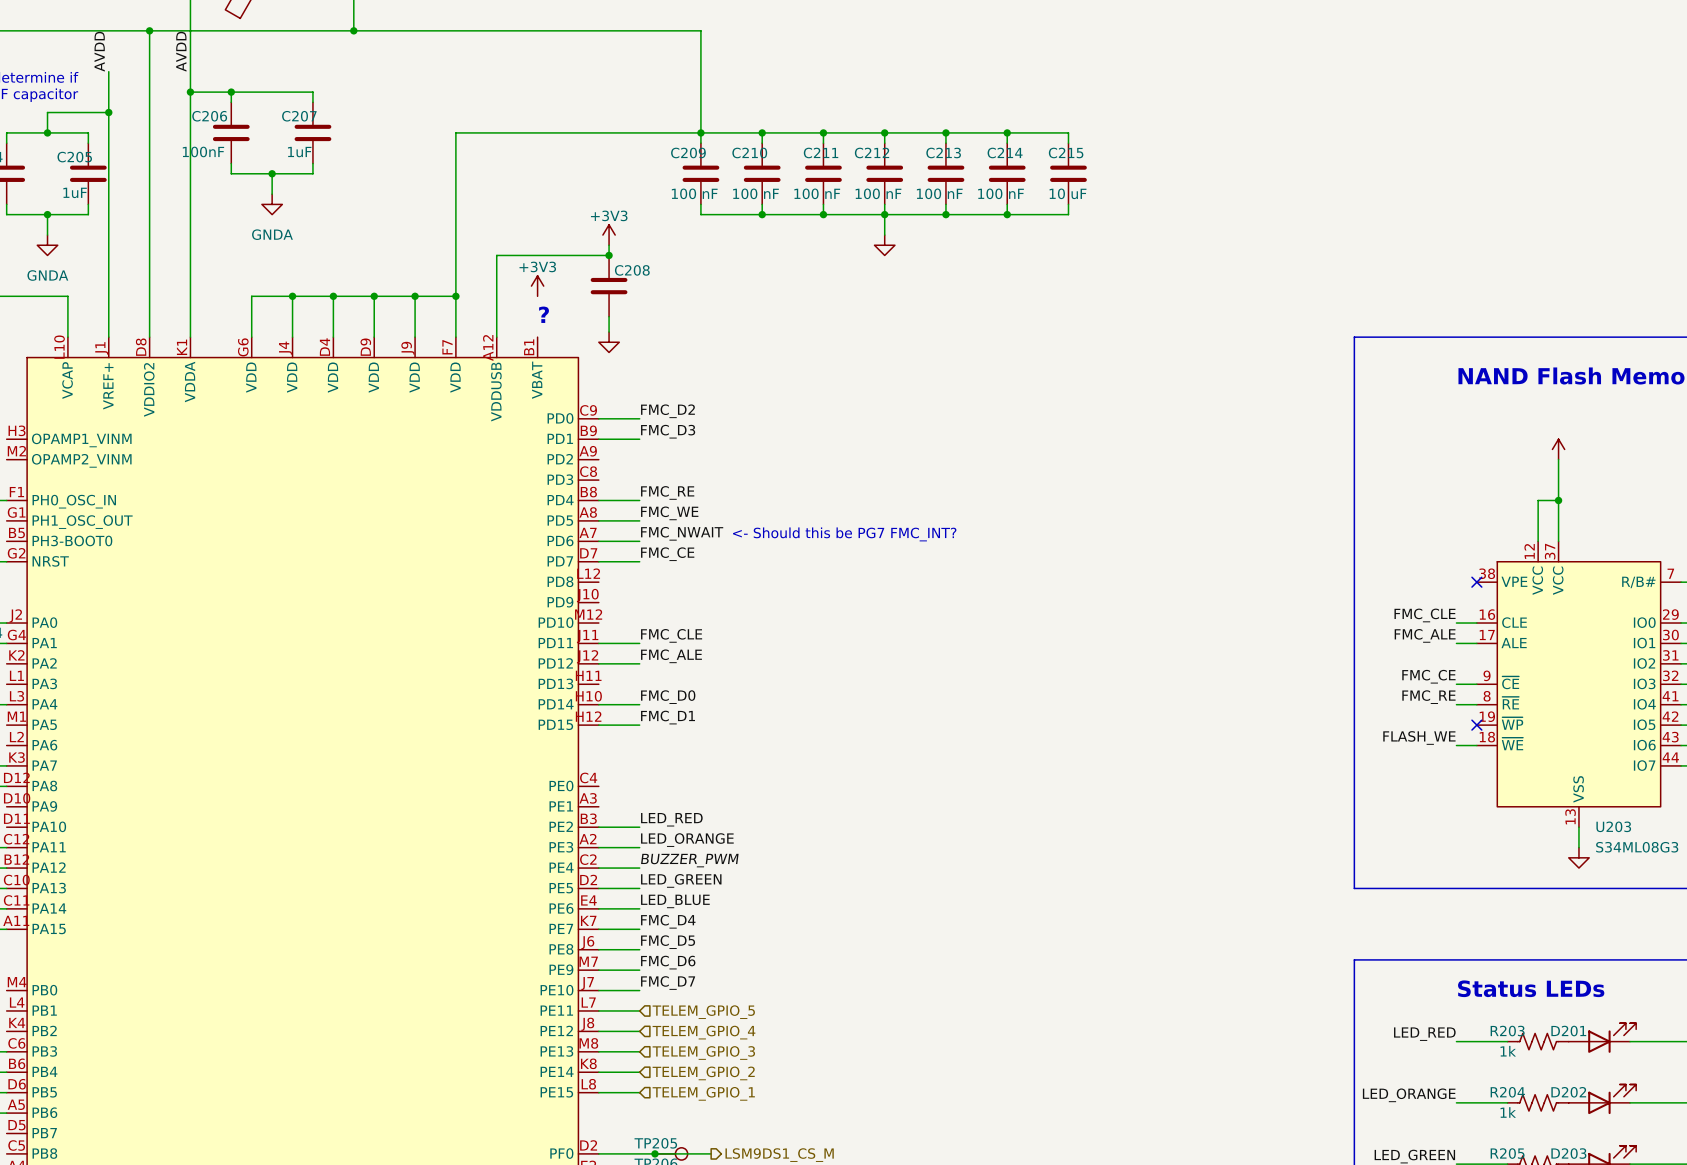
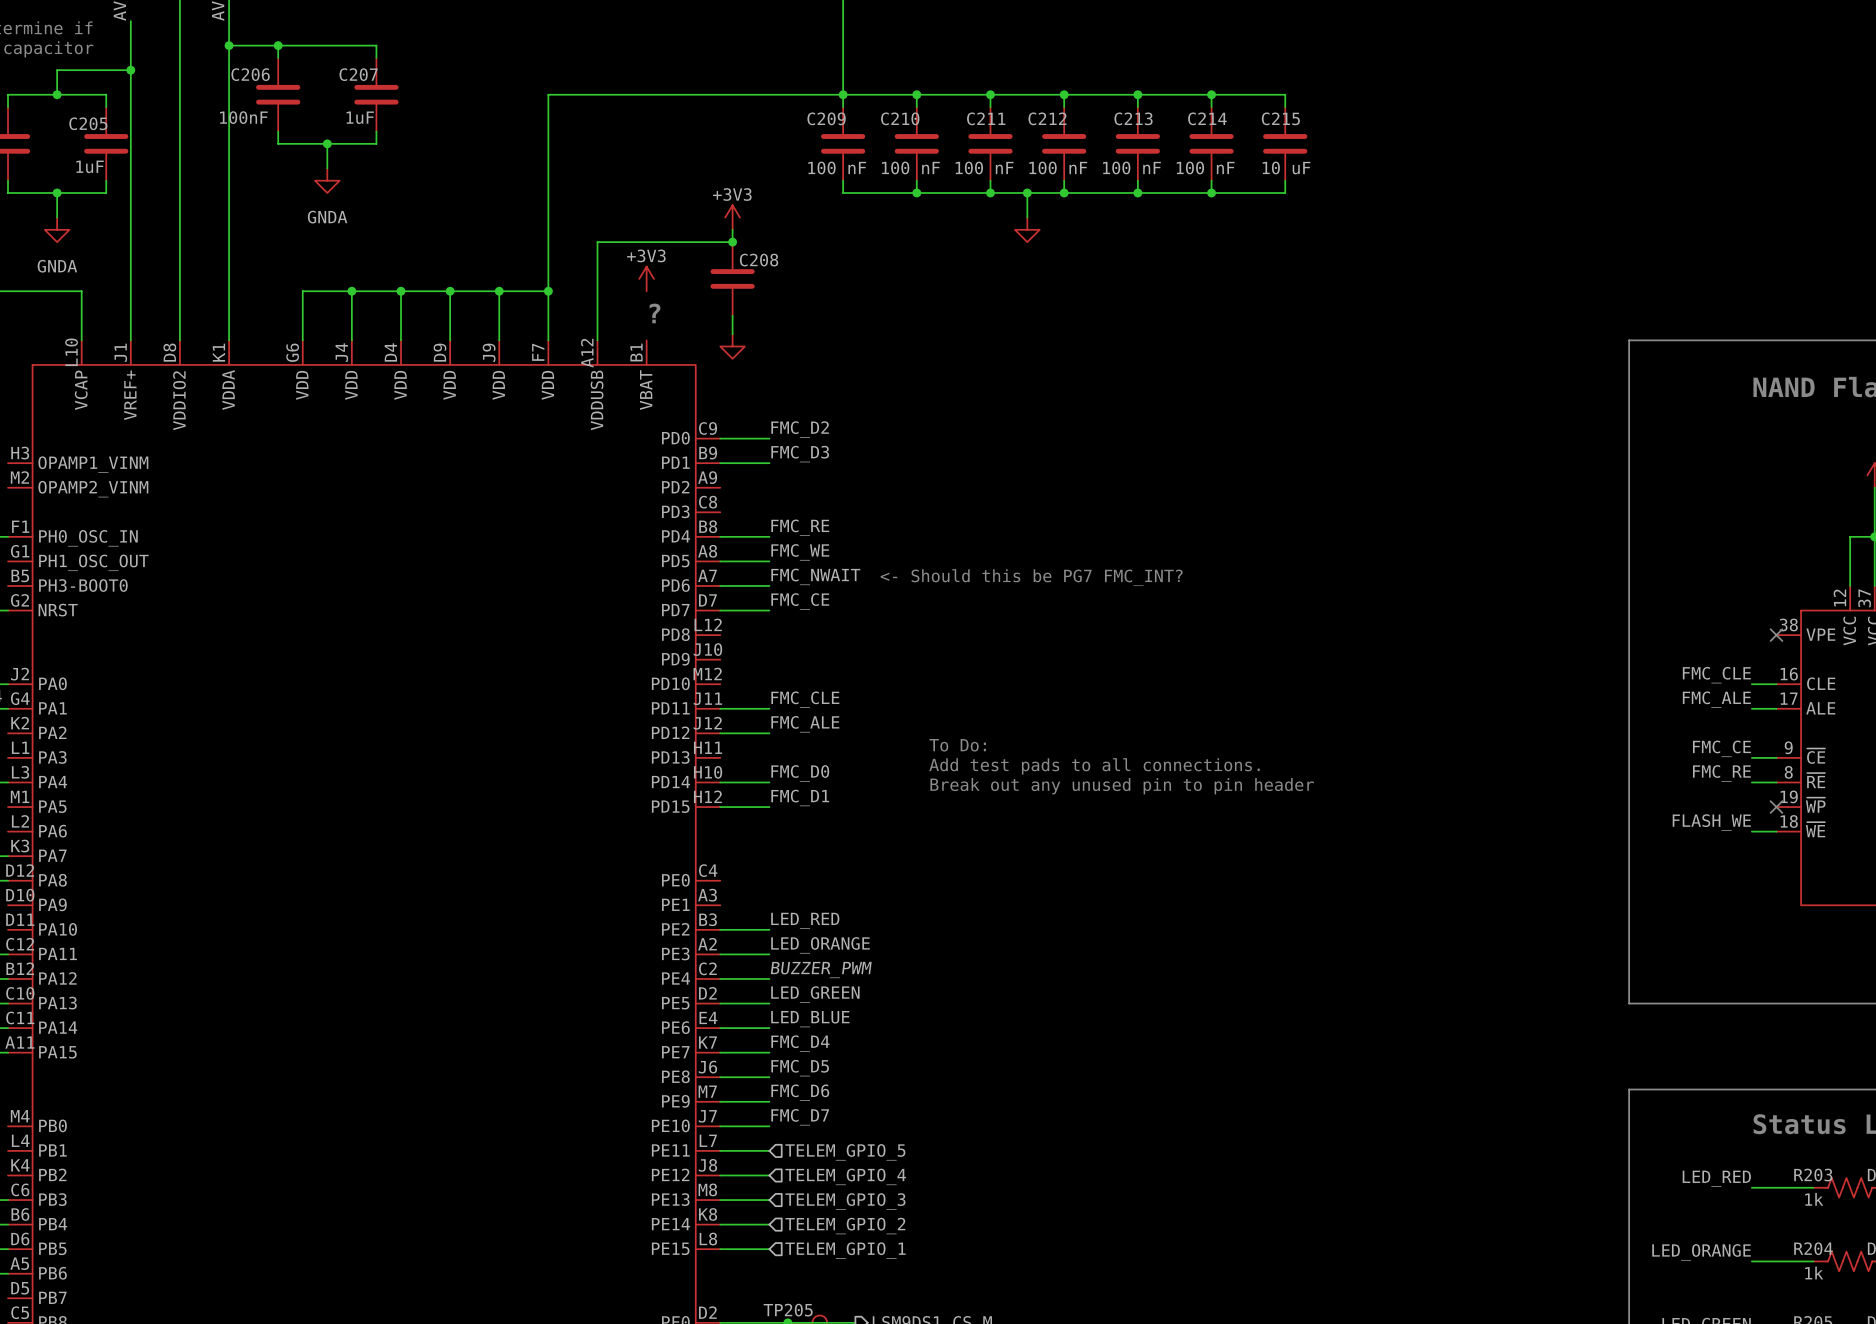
junction: none -> (1027, 192)
wire: (884, 214) (884, 235) -> (1027, 192) (1027, 217)
power symbol position: (884, 245) -> (1027, 229)
text: none -> To Do: (957, 745)
text: none -> Add test pads to all connections. (1094, 766)
text: none -> Break out any unused pin to pin header (1122, 786)

